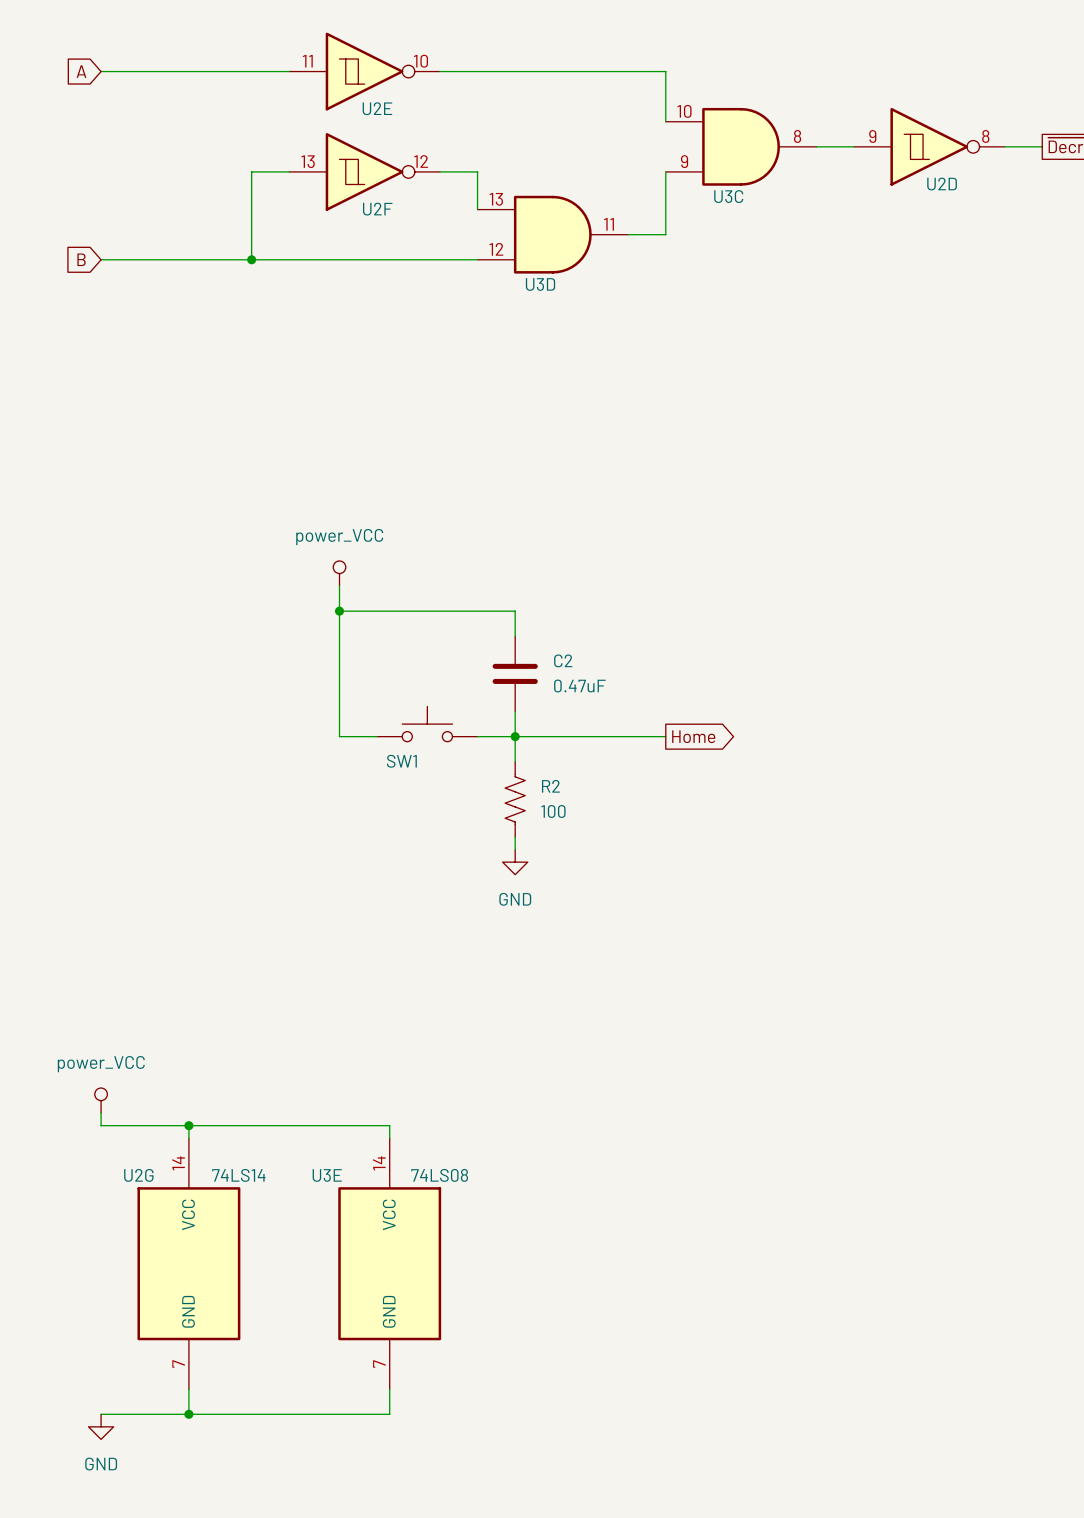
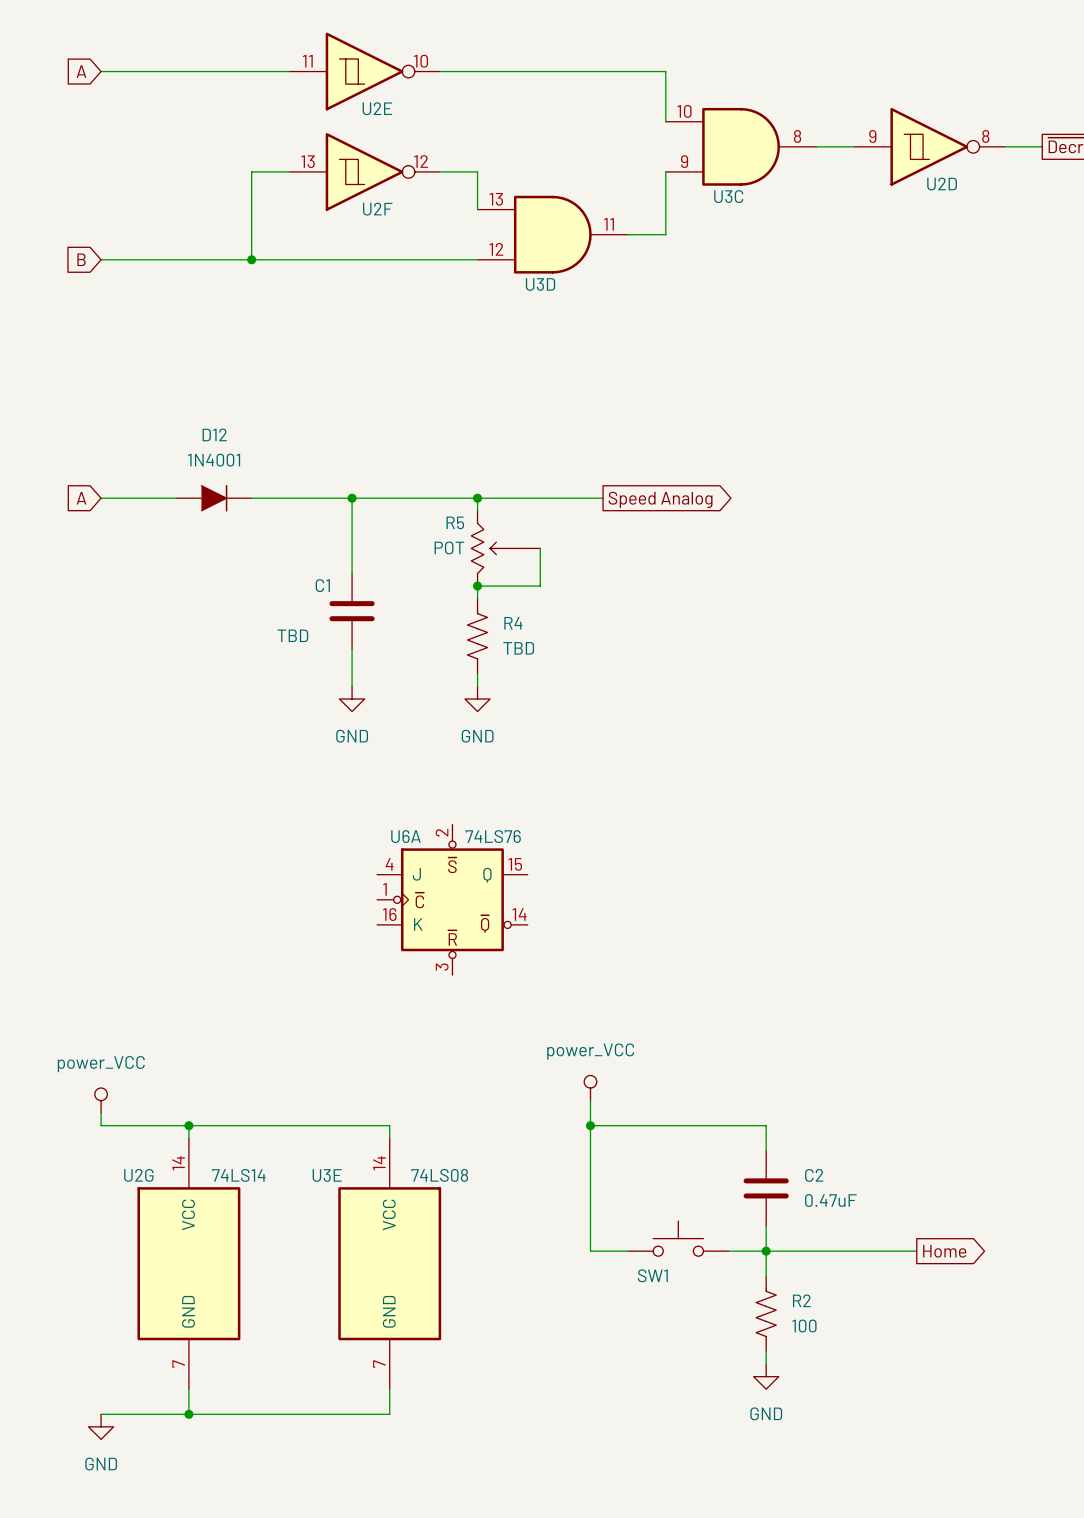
global label: none -> A (81, 498)
wire: none -> (101, 498) (176, 498)
D12: none -> 1N4001 (214, 498)
wire: none -> (251, 498) (603, 498)
wire: none -> (352, 498) (352, 573)
junction: none -> (352, 498)
wire: none -> (477, 498) (477, 510)
junction: none -> (477, 498)
global label: none -> Speed Analog (660, 499)
R5: none -> POT (505, 548)
wire: none -> (540, 548) (540, 586) (477, 586) (477, 598)
power symbol: power_VCC (339, 573) -> none
wire: (339, 586) (339, 736) (377, 736) -> none
junction: none -> (477, 586)
wire: (339, 611) (515, 611) (515, 636) -> none
junction: (339, 611) -> none
C1: none -> TBD (352, 611)
R4: none -> TBD (477, 636)
wire: none -> (352, 648) (352, 686)
C2 position: (515, 673) -> (766, 1188)
power symbol: none -> GND (352, 699)
power symbol: none -> GND (477, 699)
wire: (515, 711) (515, 761) -> none
SW1 position: (427, 724) -> (678, 1238)
wire: (477, 736) (665, 736) -> none
junction: (515, 736) -> none
global label: Home (693, 736) -> none
R2 position: (515, 799) -> (766, 1313)
wire: (515, 837) (515, 849) -> (477, 673) (477, 686)
power symbol: GND (515, 862) -> none
U6A: none -> 74LS76 (452, 899)
power symbol: none -> power_VCC (590, 1088)
wire: none -> (590, 1100) (590, 1251) (628, 1251)
wire: none -> (590, 1125) (766, 1125) (766, 1150)
junction: none -> (590, 1125)
wire: none -> (766, 1226) (766, 1276)
wire: none -> (728, 1251) (916, 1251)
junction: none -> (766, 1251)
global label: none -> Home (944, 1251)
wire: none -> (766, 1351) (766, 1364)
power symbol: none -> GND (766, 1376)

